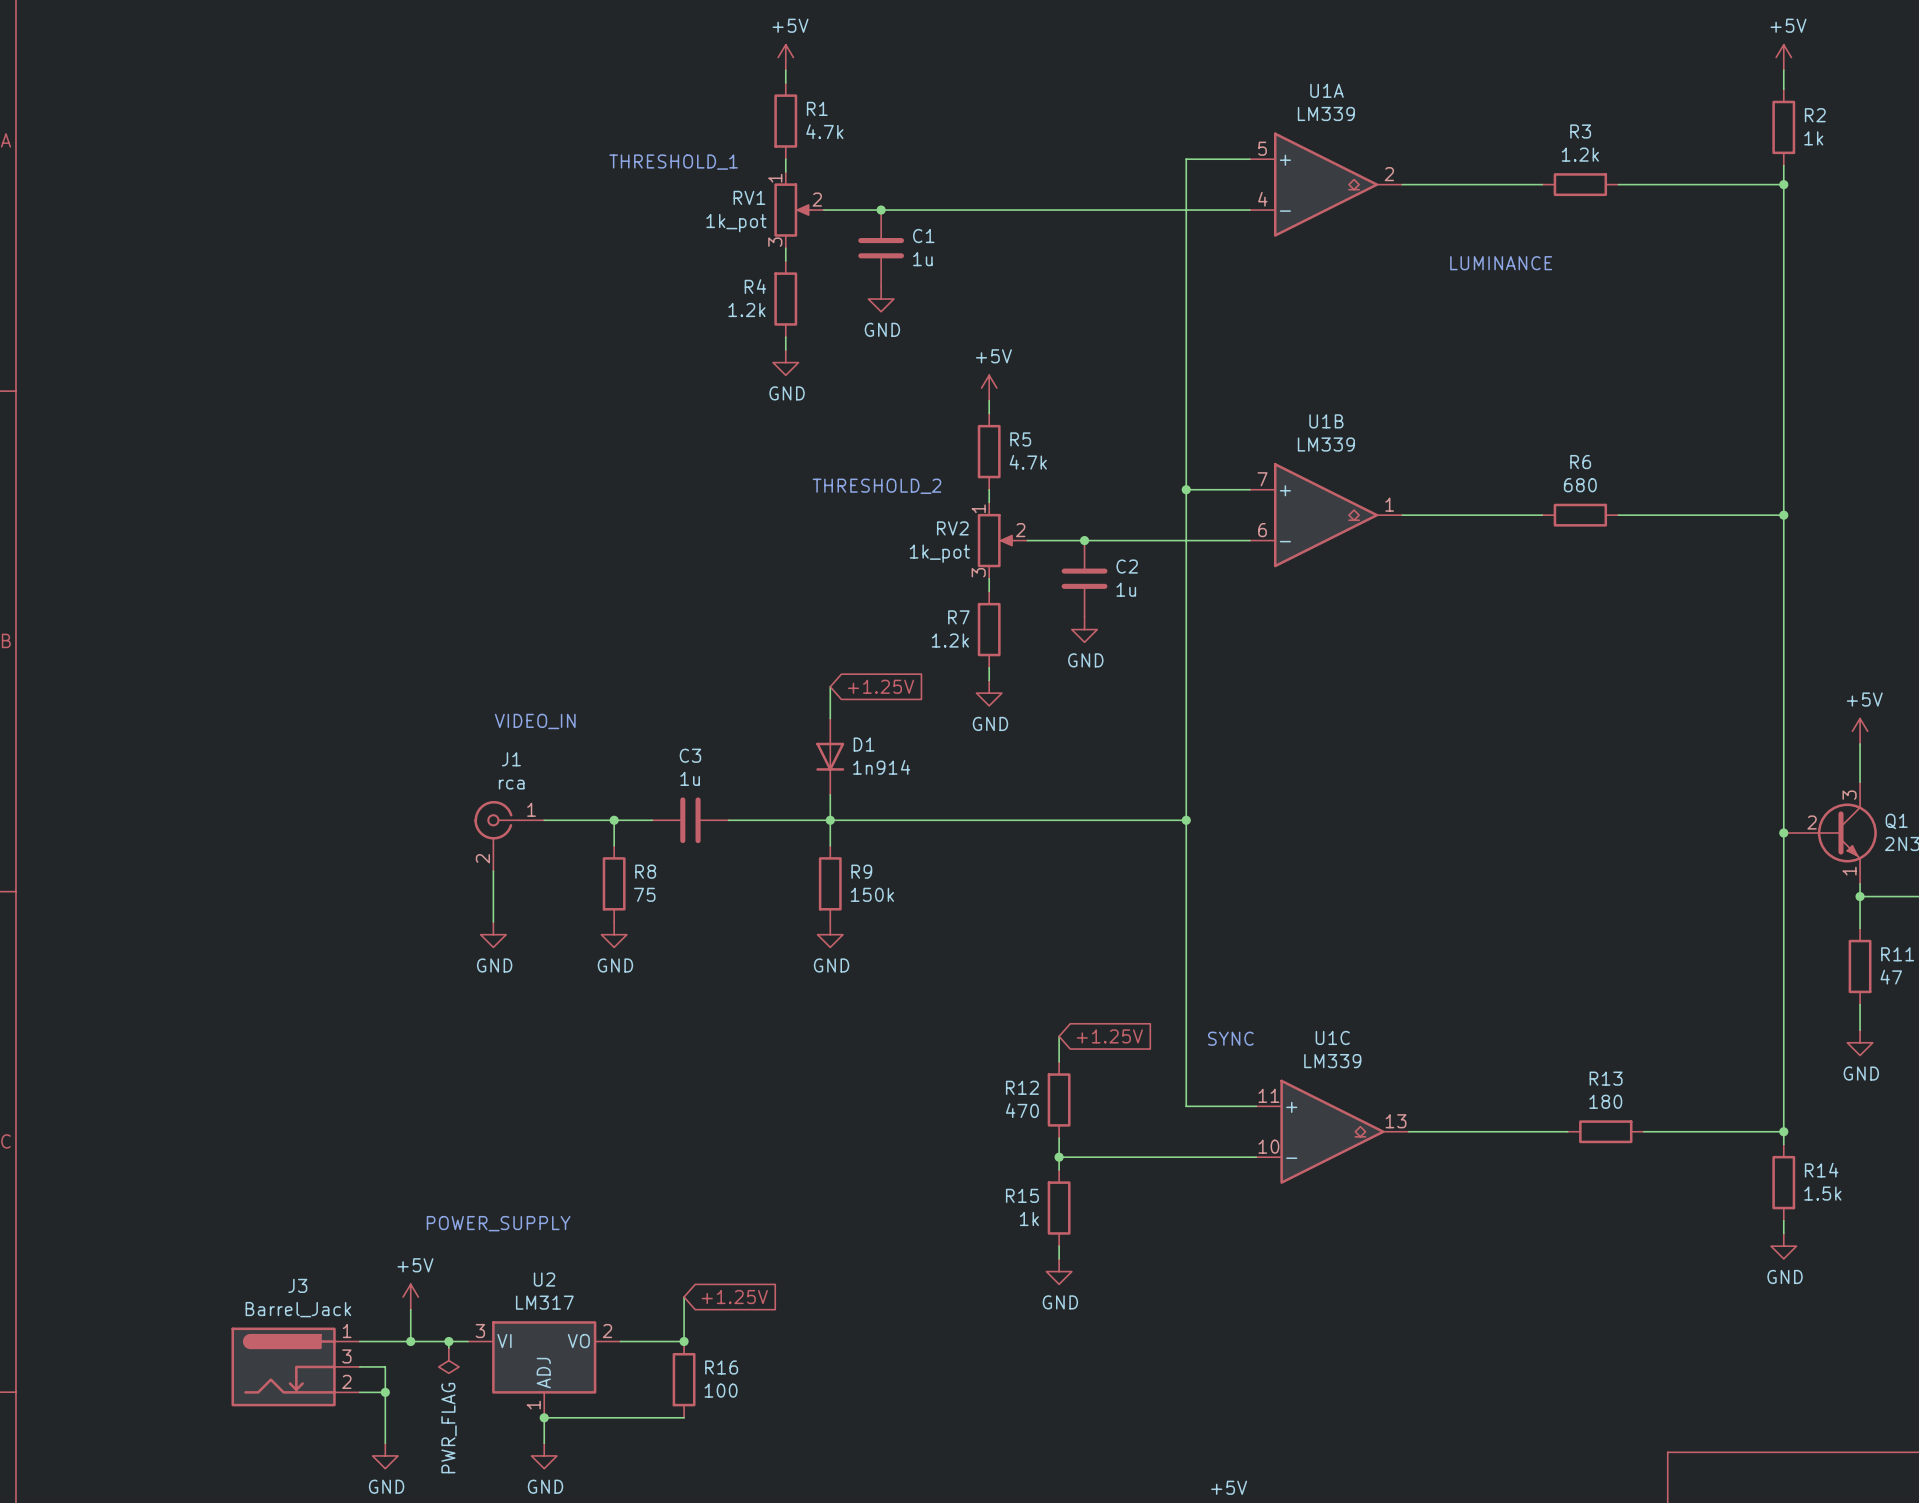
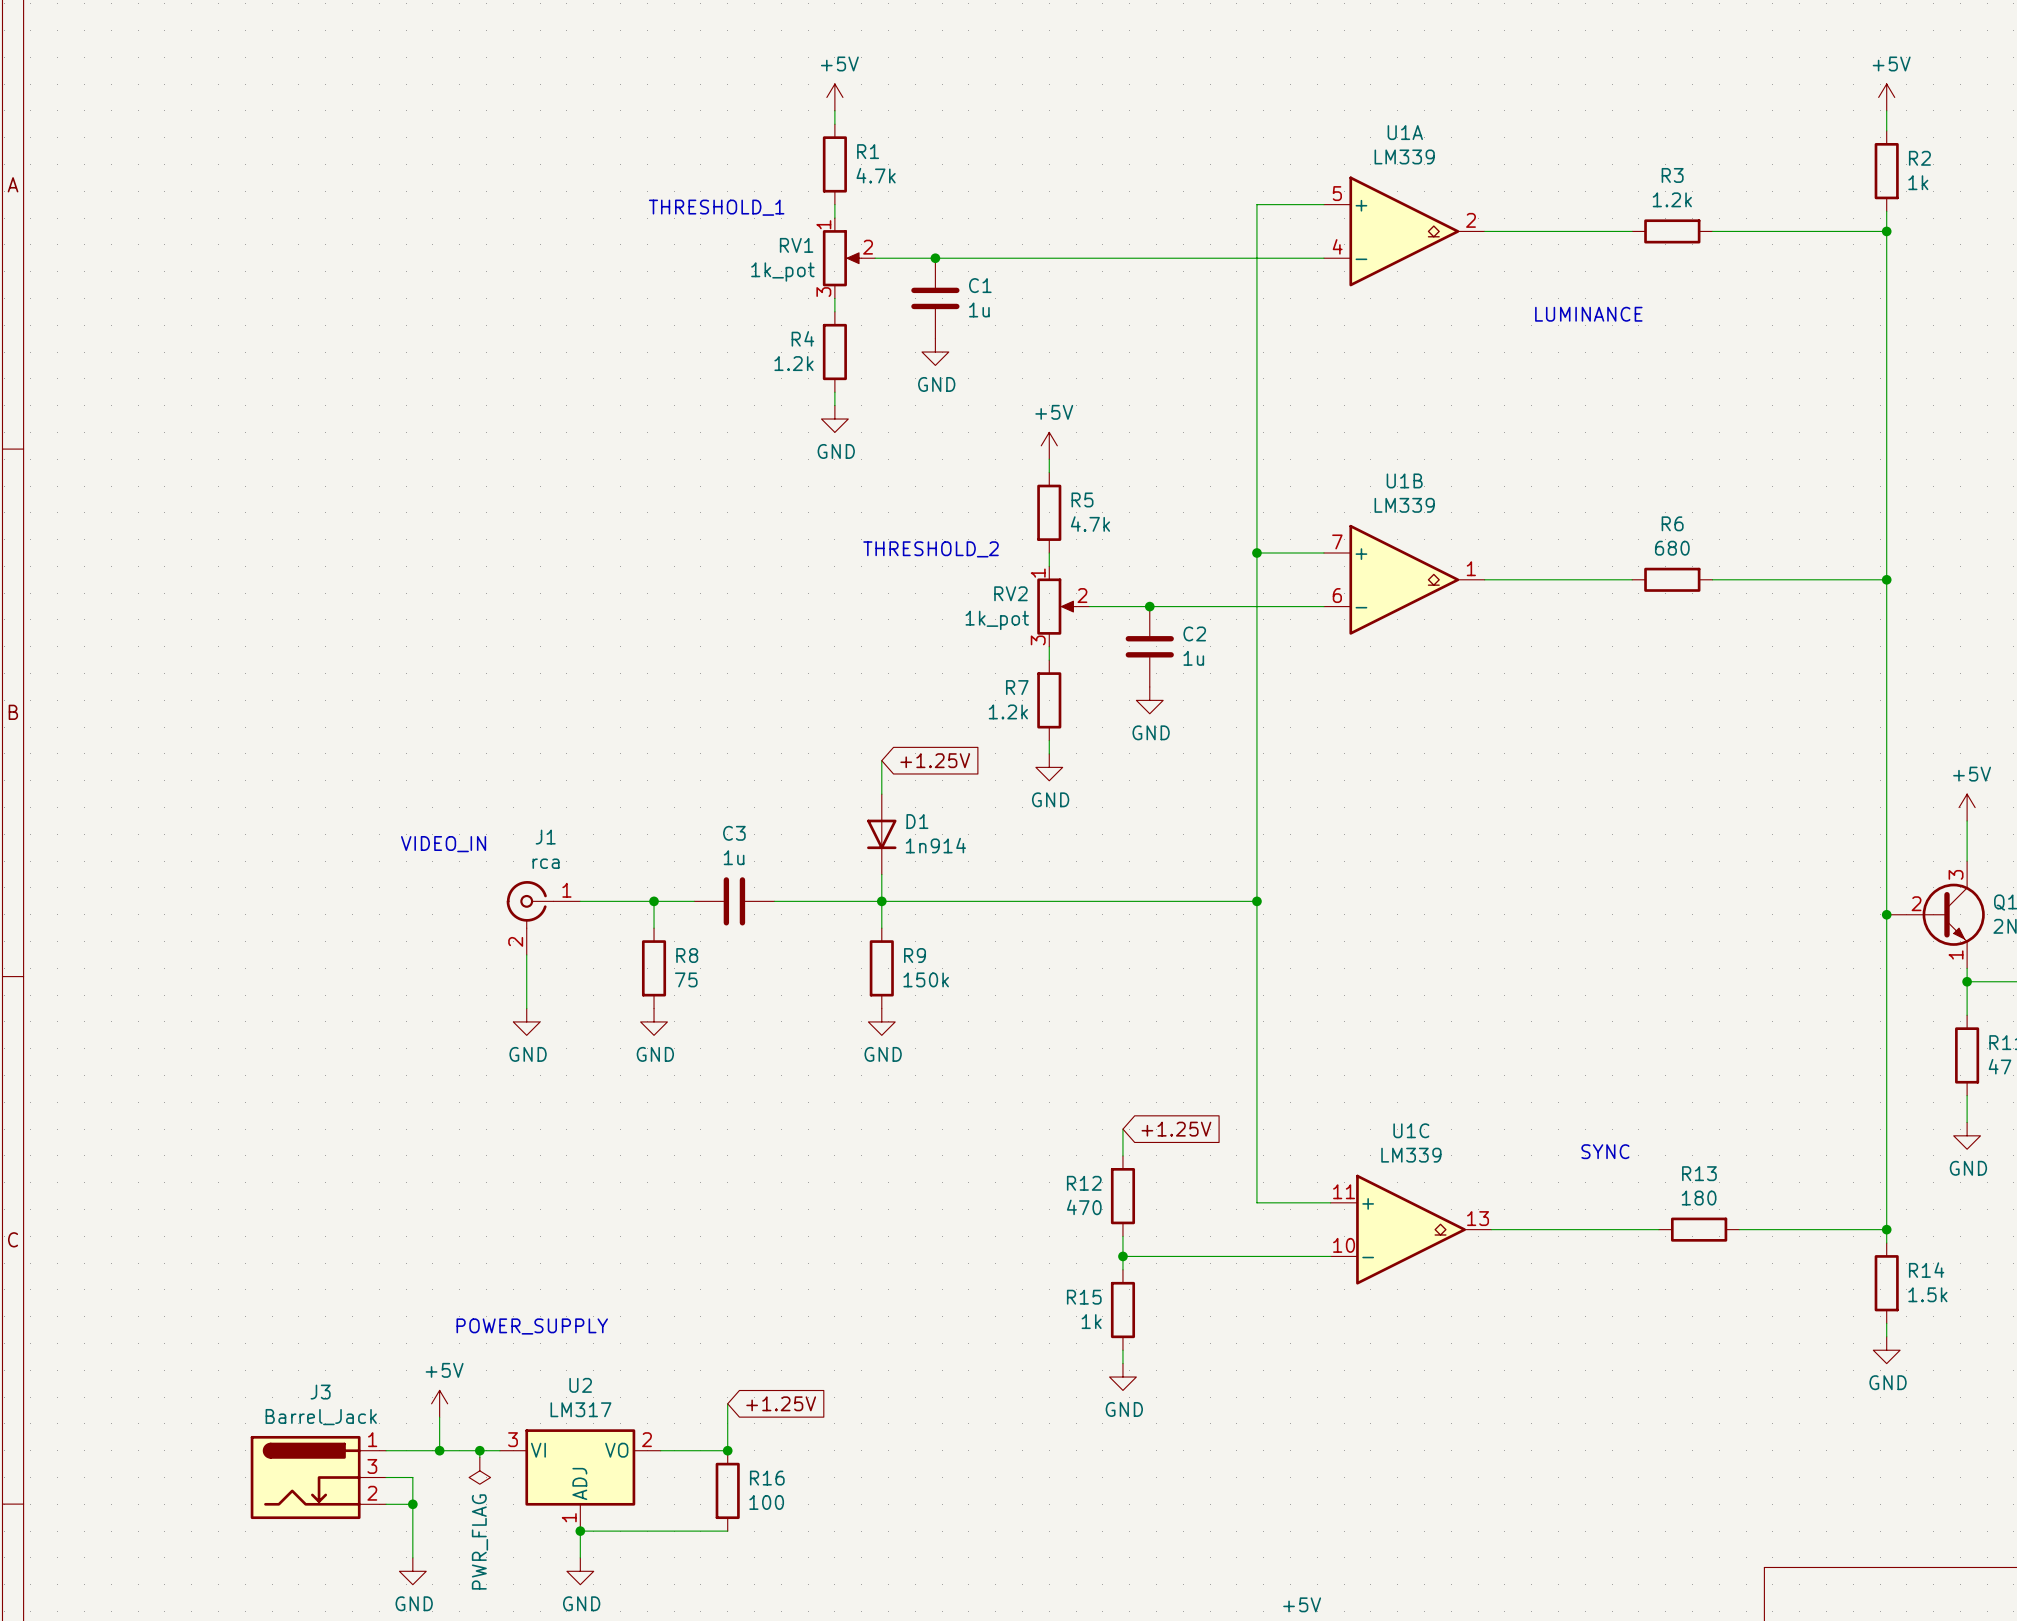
text position: VIDEO_IN (535, 721) -> VIDEO_IN (443, 844)
text: SYNC (1230, 1038) -> none
text: none -> SYNC (1605, 1151)

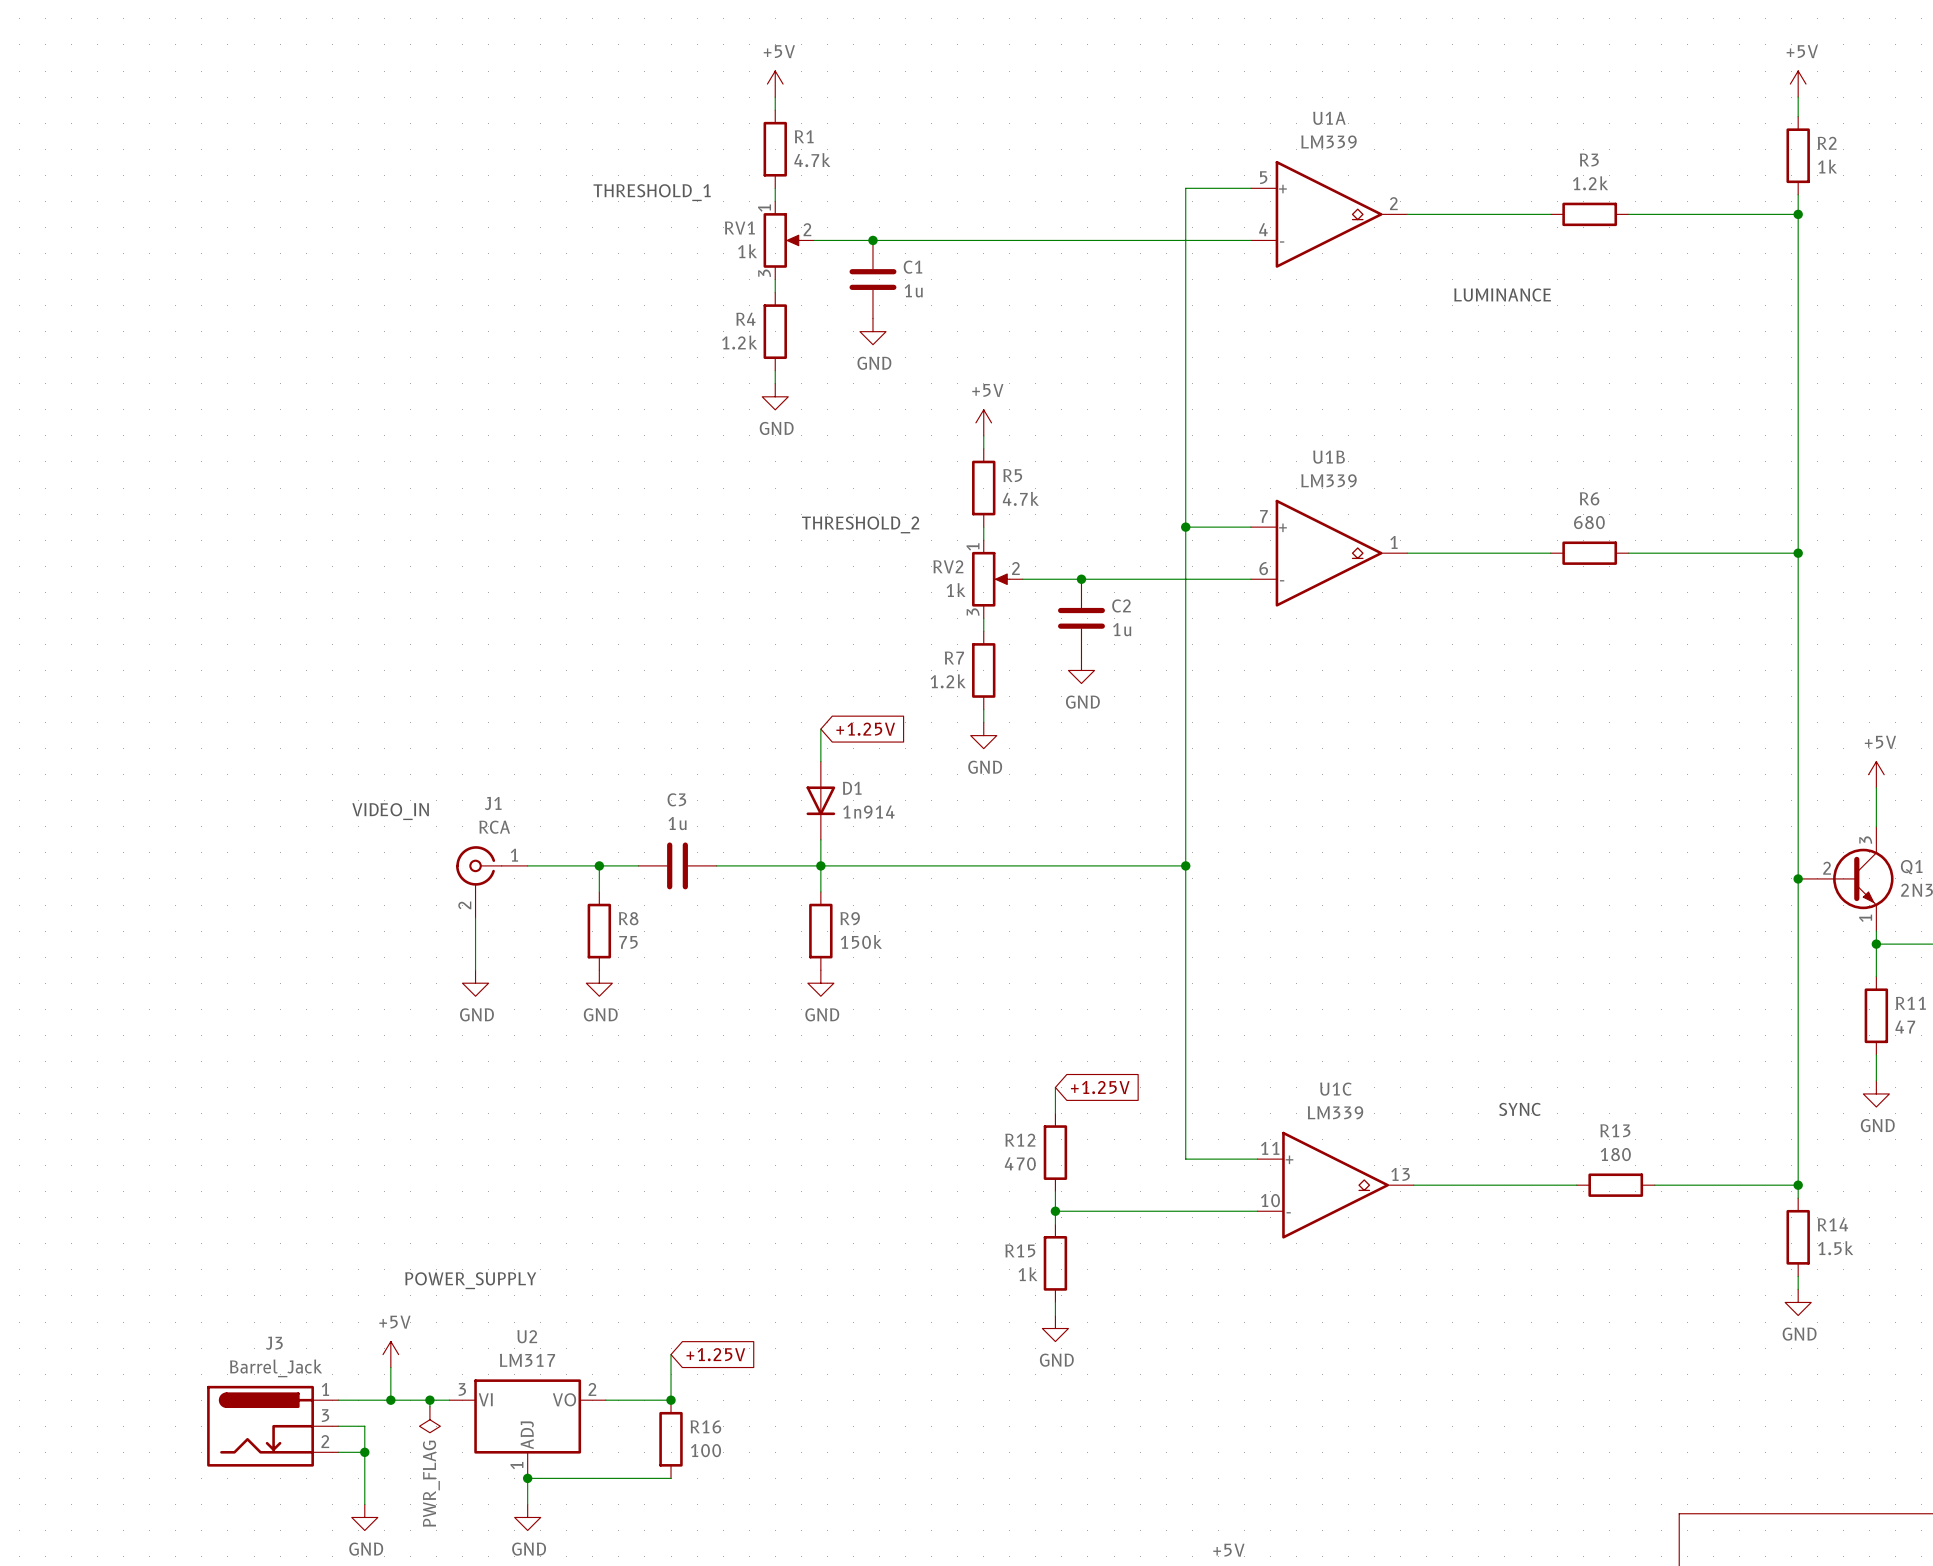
RV1 value: 1k_pot (782, 272) -> 1k (747, 251)
RV2 value: 1k_pot (997, 620) -> 1k (956, 590)
J1 value: rca (546, 863) -> RCA (494, 827)

